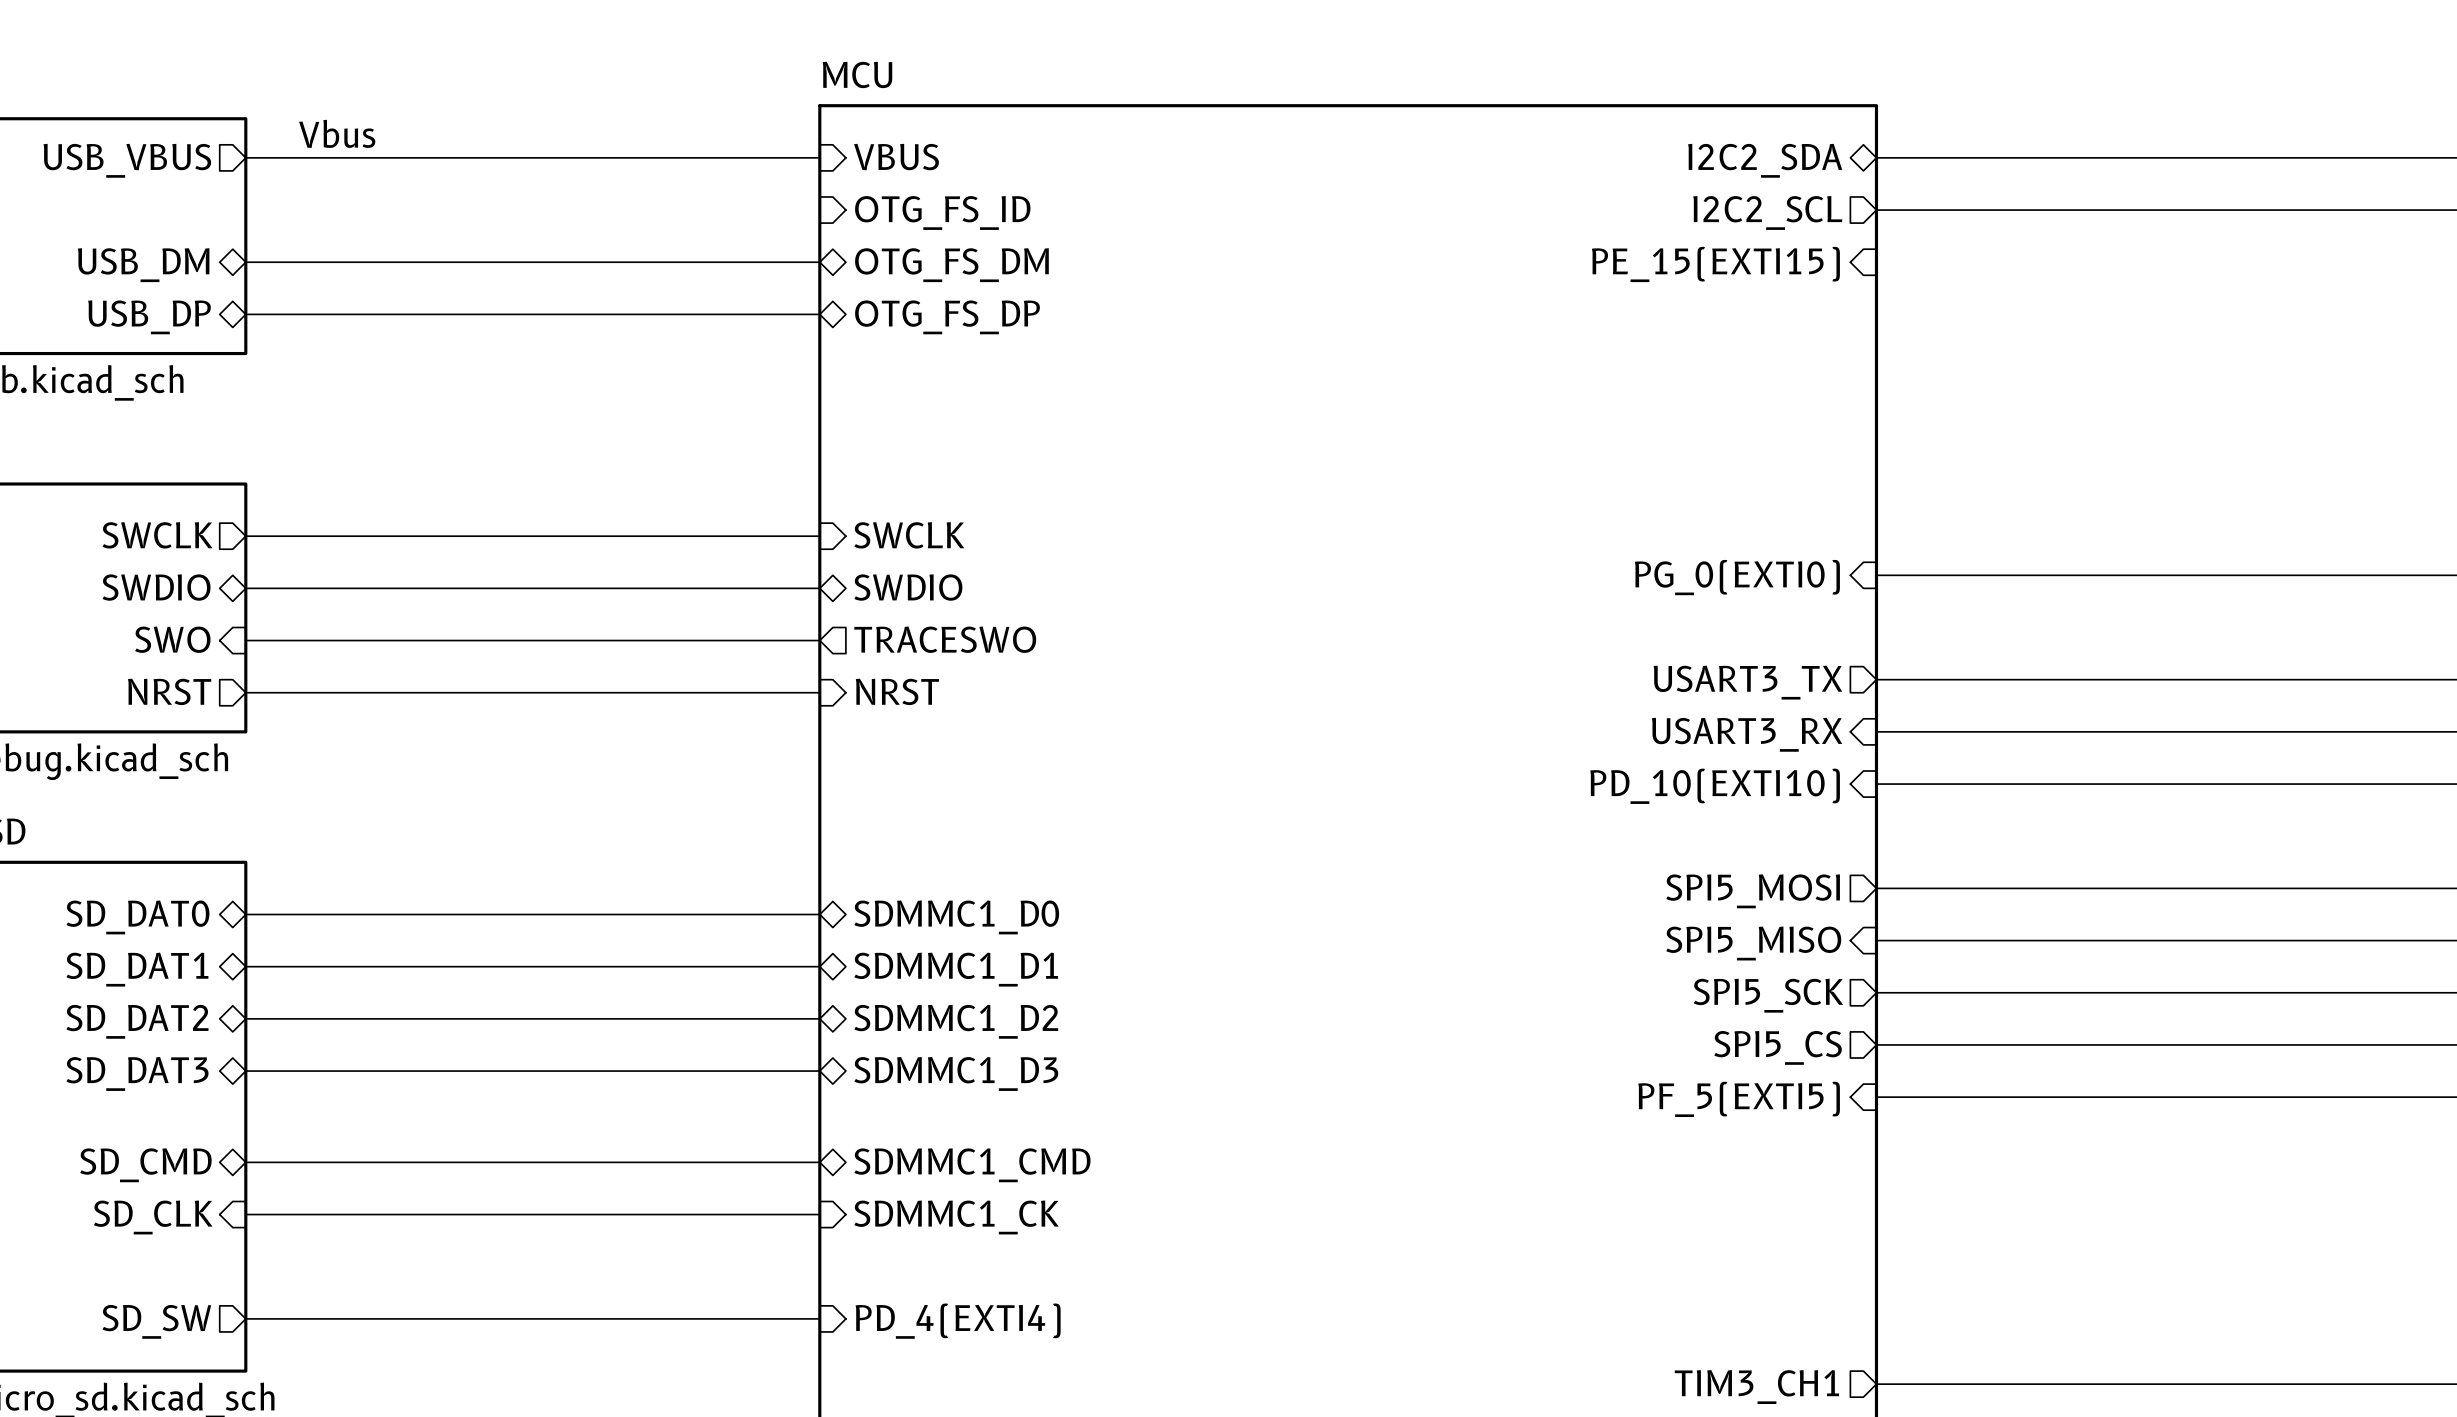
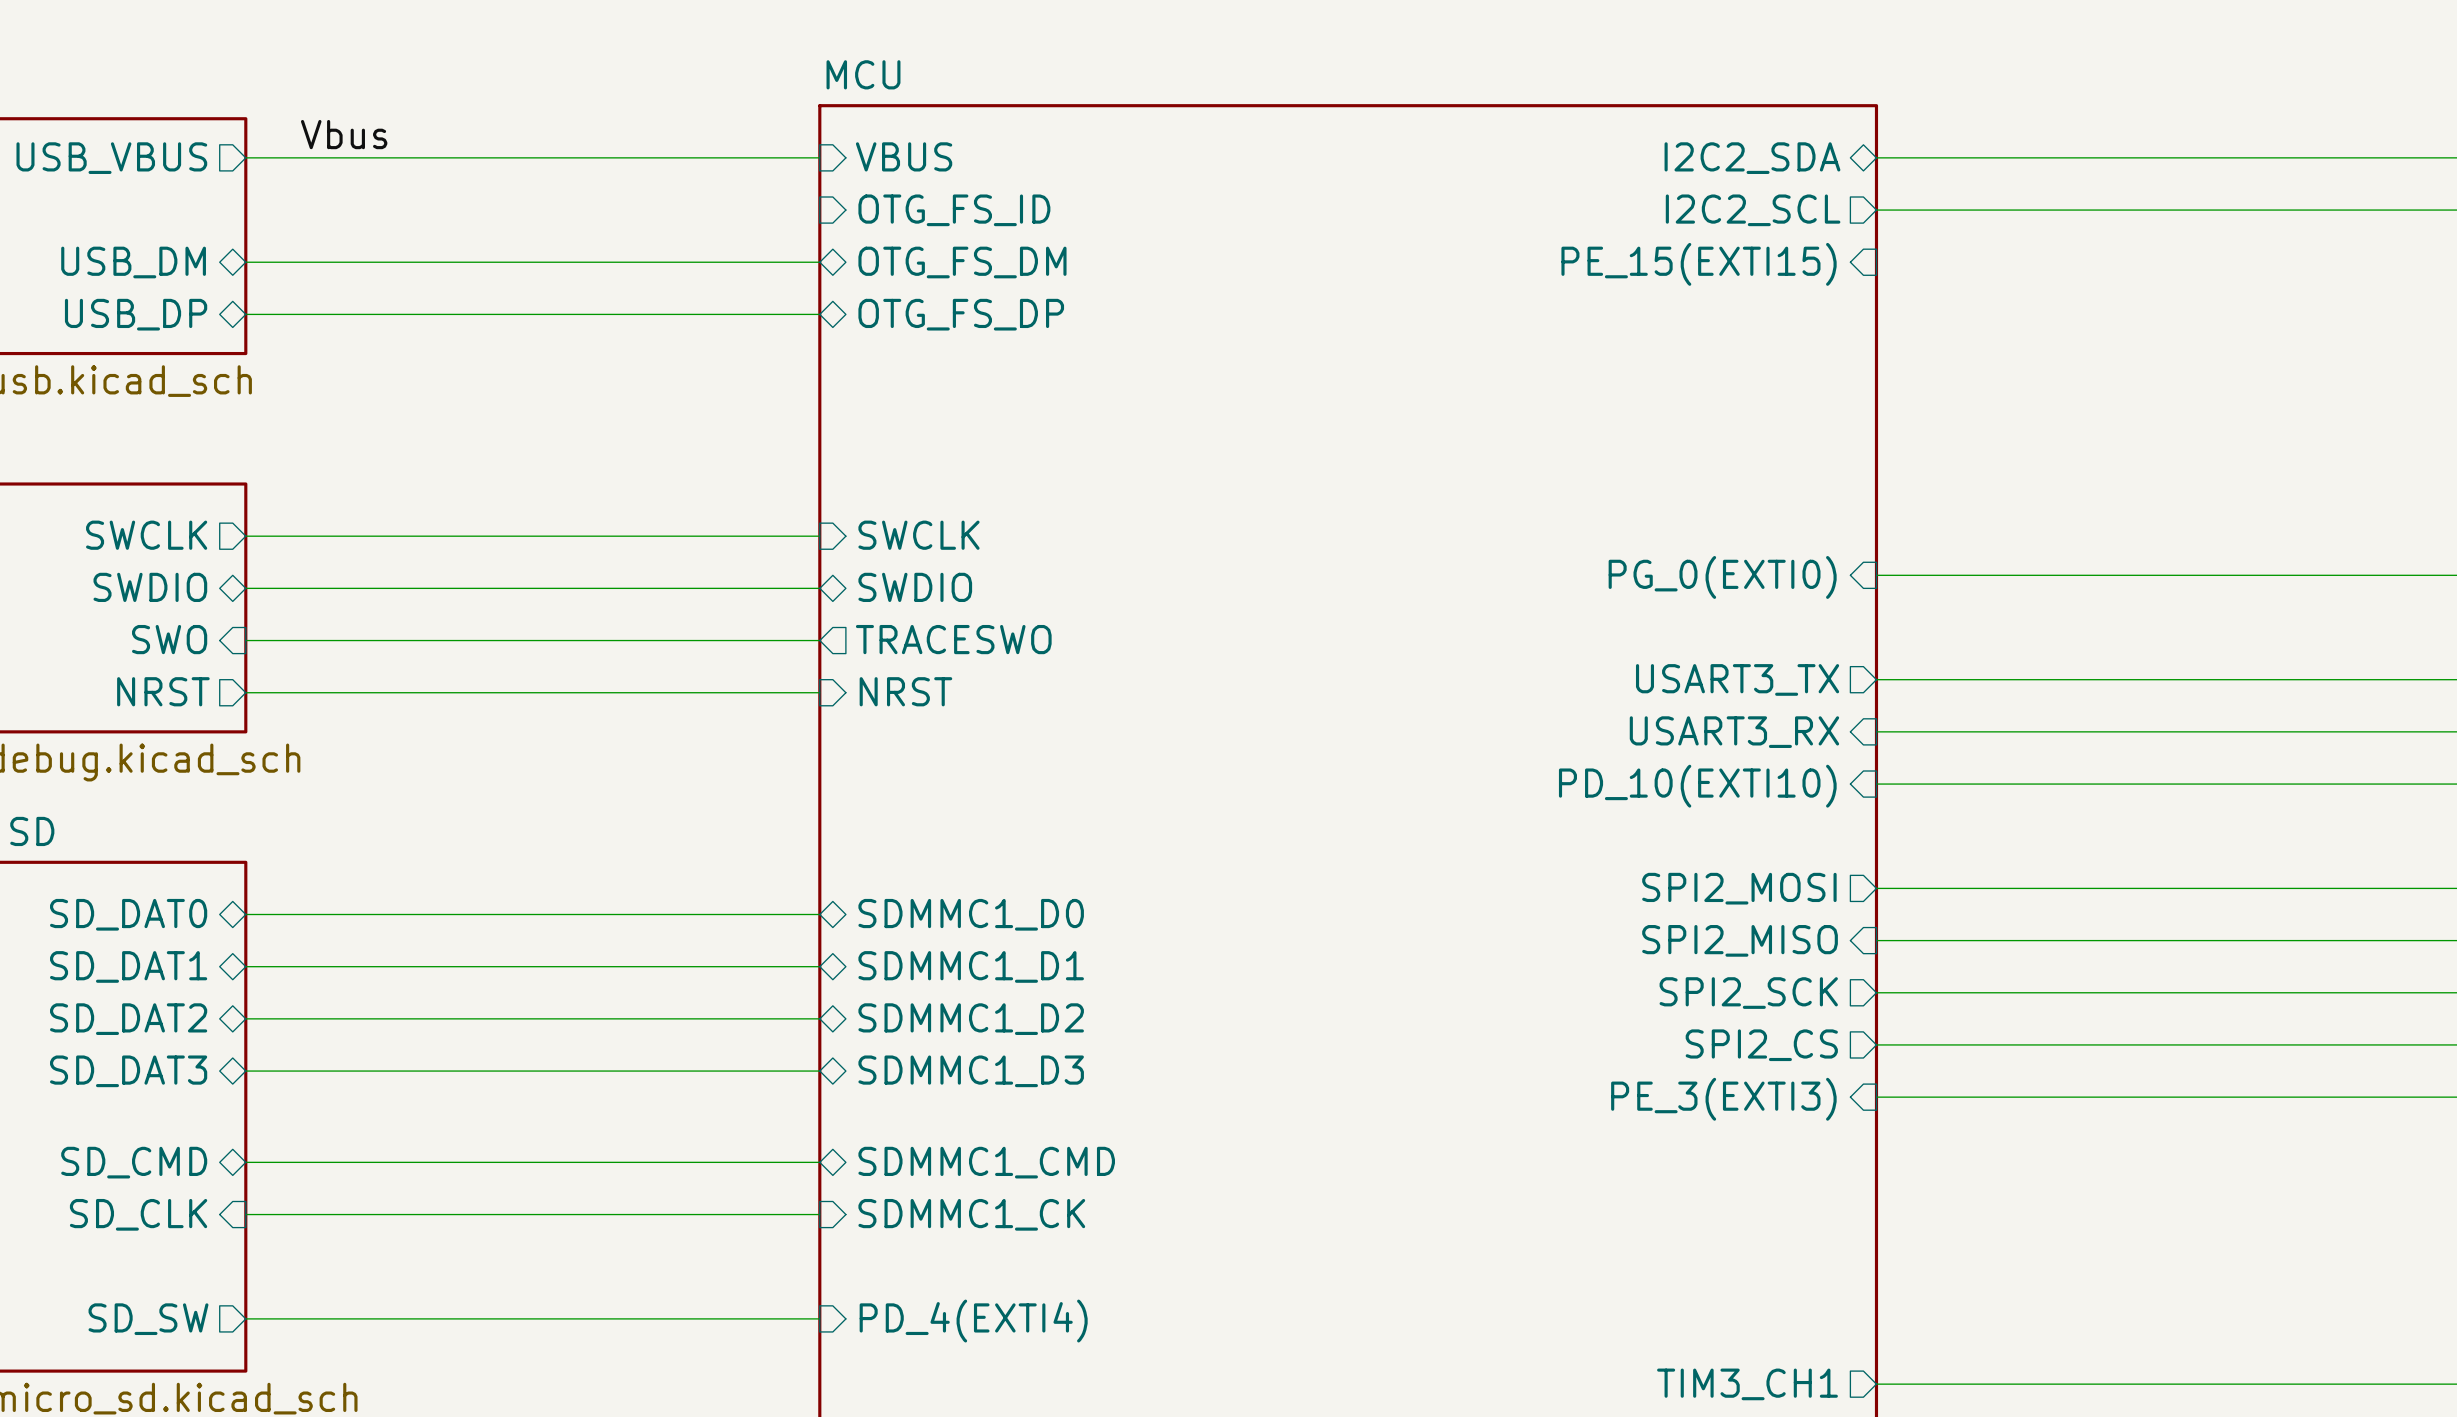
sheet pin: SPI5_MOSI (1753, 891) -> SPI2_MOSI (1739, 888)
sheet pin: SPI5_MISO (1753, 943) -> SPI2_MISO (1740, 940)
sheet pin: SPI5_SCK (1768, 995) -> SPI2_SCK (1748, 993)
sheet pin: SPI5_CS (1778, 1047) -> SPI2_CS (1761, 1045)
sheet pin: PF_5(EXTI5) (1739, 1099) -> PE_3(EXTI3) (1723, 1099)

